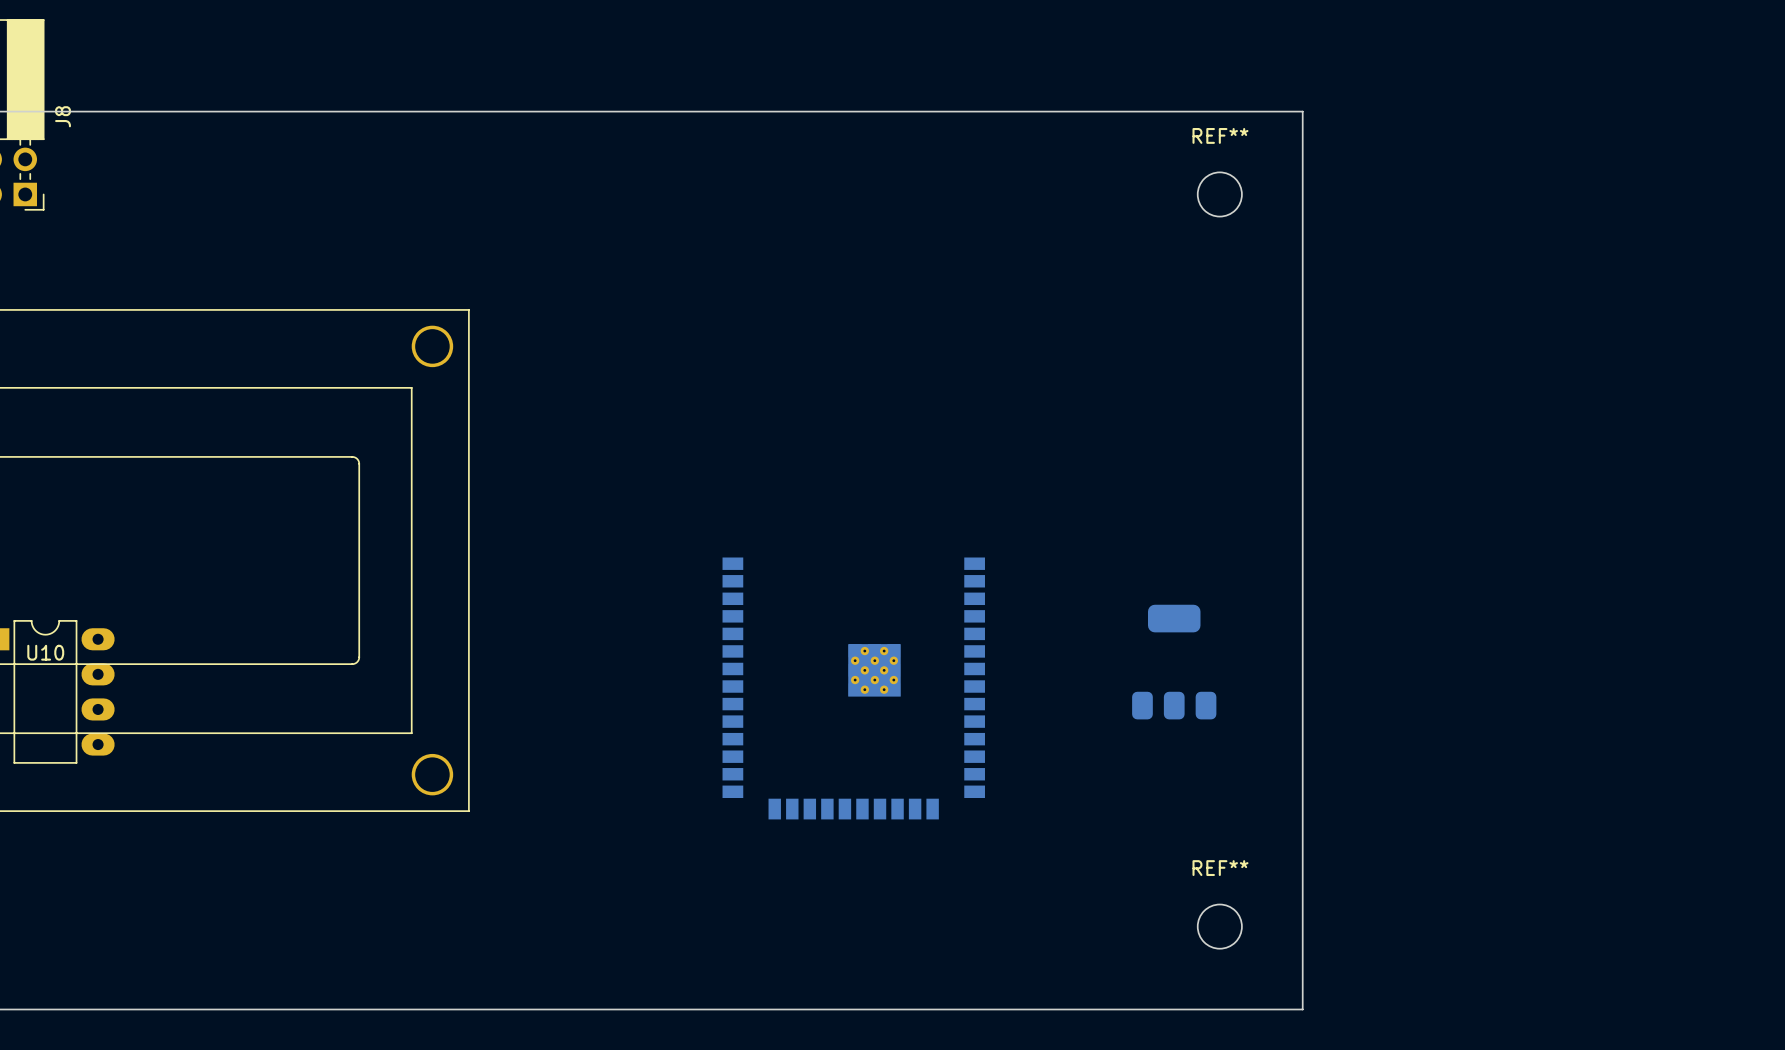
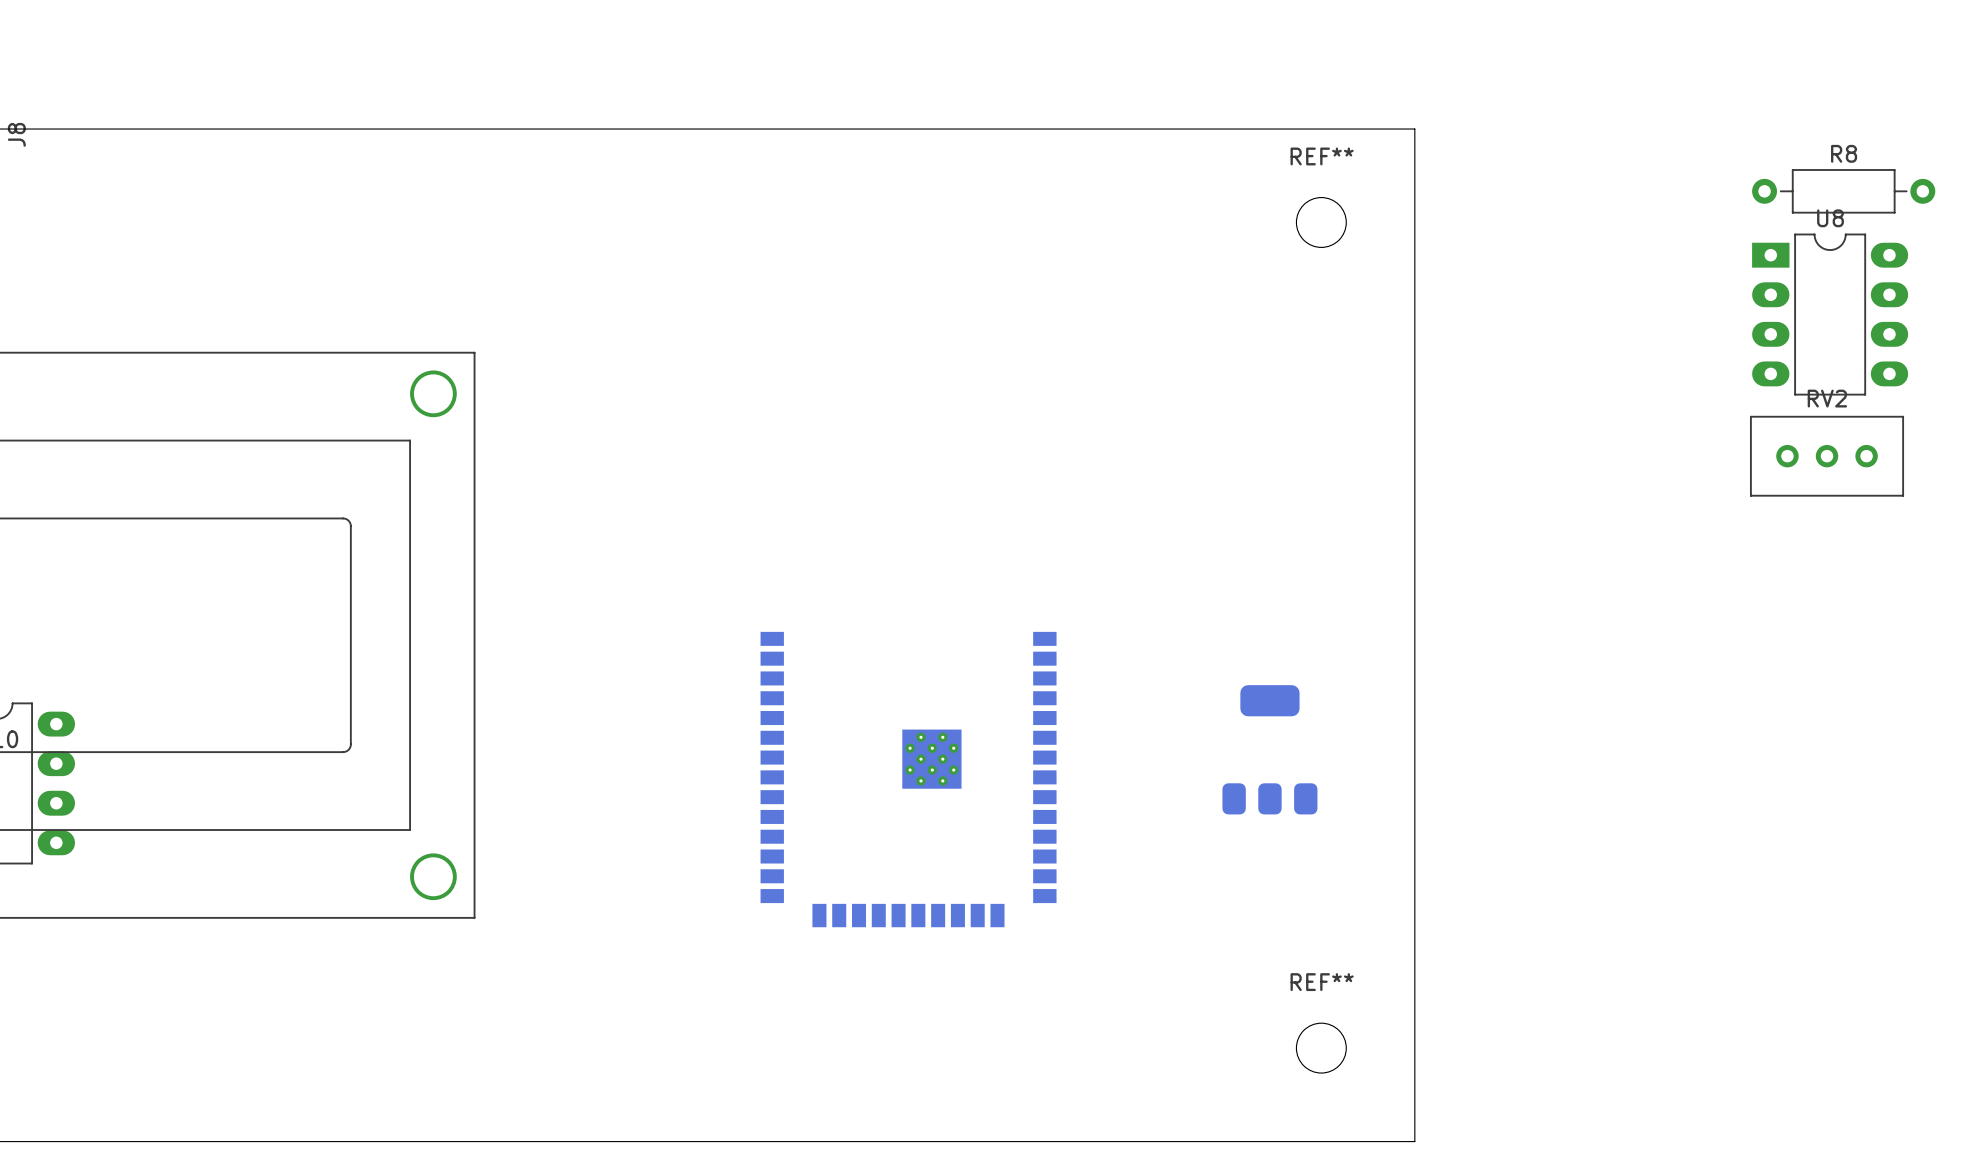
R8: none -> (1843, 191)
U8: none -> (1830, 314)
RV2: none -> (1827, 456)

